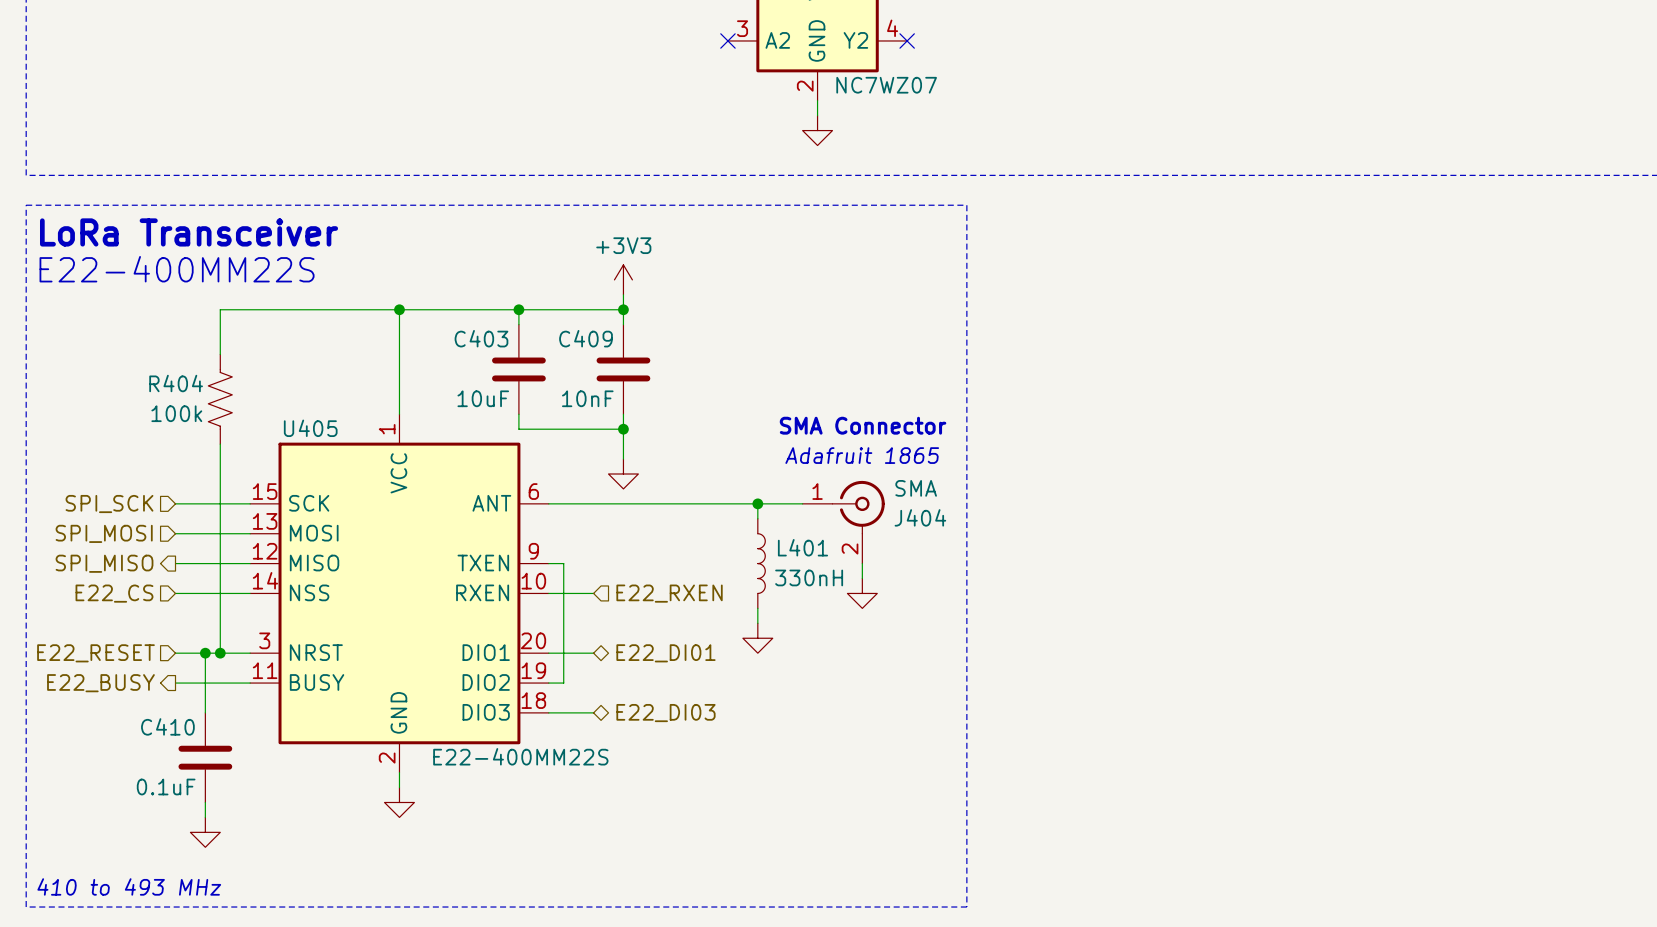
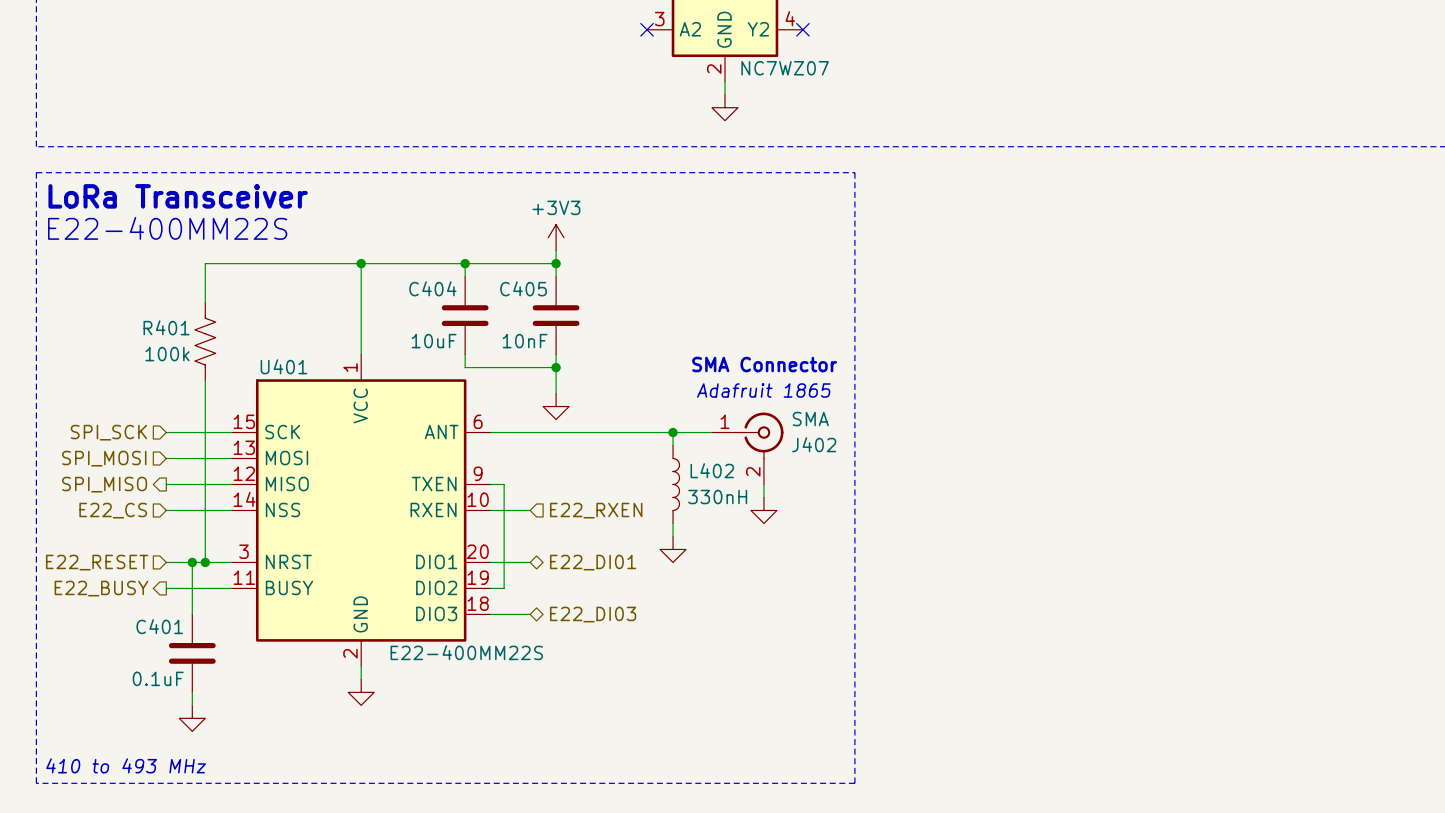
C403 name: C403 (481, 338) -> C404 (432, 288)
C409 name: C409 (586, 338) -> C405 (523, 288)
R404 name: R404 (176, 383) -> R401 (166, 327)
U405 name: U405 (310, 428) -> U401 (283, 366)
J404 name: J404 (920, 517) -> J402 (814, 444)
L401 name: L401 (802, 547) -> L402 (712, 470)
C410 name: C410 (167, 726) -> C401 (159, 626)

